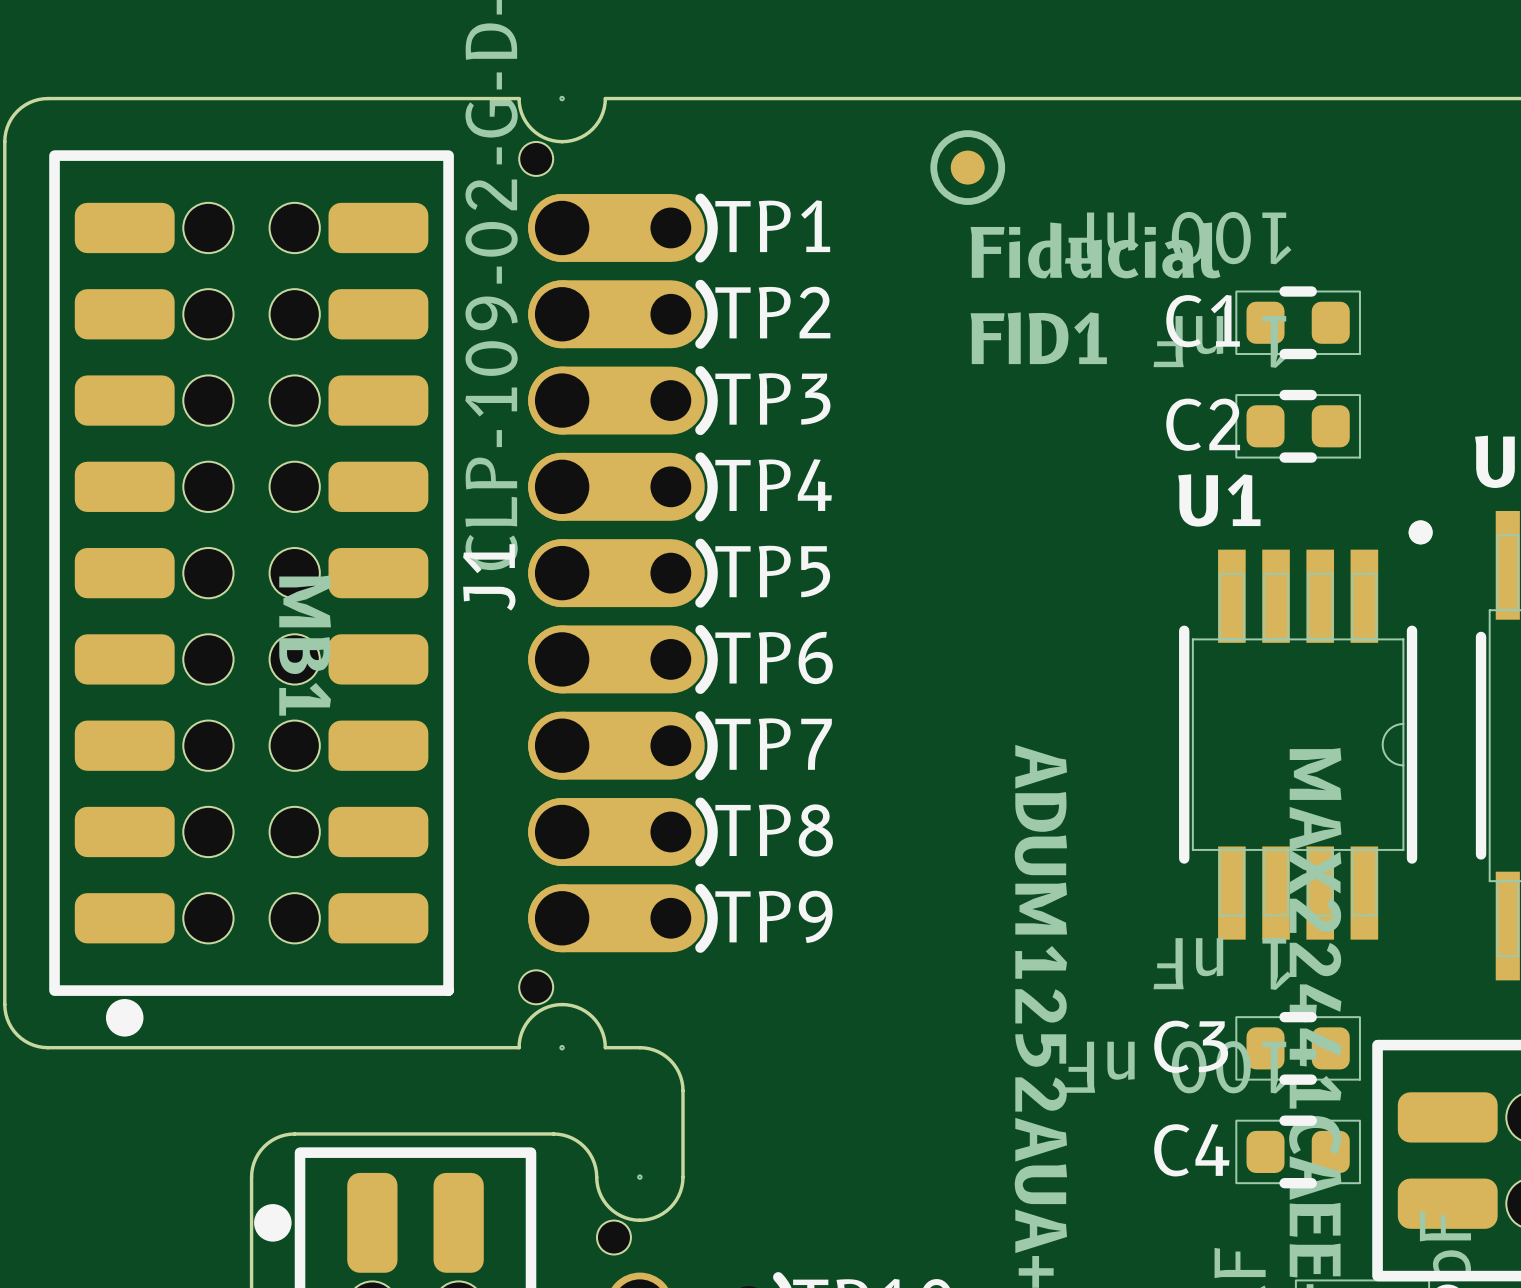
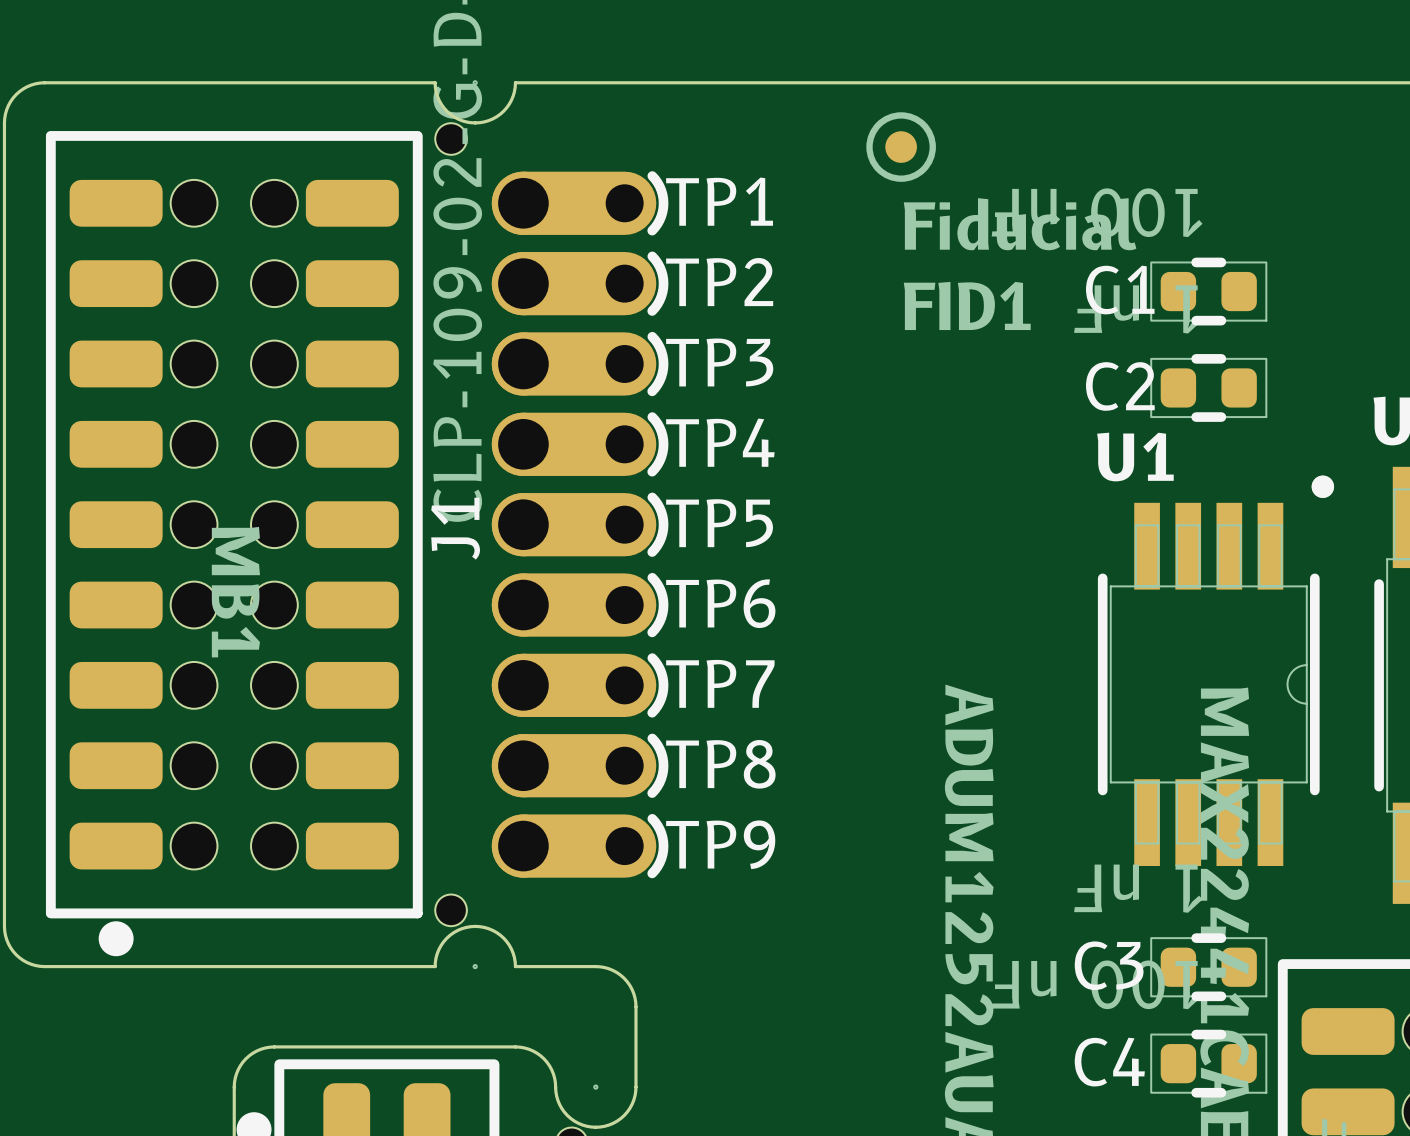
board edge: (467, 98) (519, 98) (523, 117) (531, 129) (547, 139) (562, 141) (580, 137) (592, 129) (602, 112) (605, 98) -> (435, 82) (439, 100) (446, 111) (457, 118) (475, 122) (488, 120) (503, 111) (511, 100) (515, 82) (563, 82)
MB1 position: (562, 573) -> (475, 524)
board edge: (467, 1047) (519, 1047) (523, 1028) (531, 1017) (547, 1006) (562, 1004) (576, 1006) (592, 1017) (601, 1028) (605, 1047) -> (435, 966) (439, 949) (446, 938) (457, 930) (475, 926) (488, 928) (503, 938) (513, 953) (515, 966) (563, 966)

